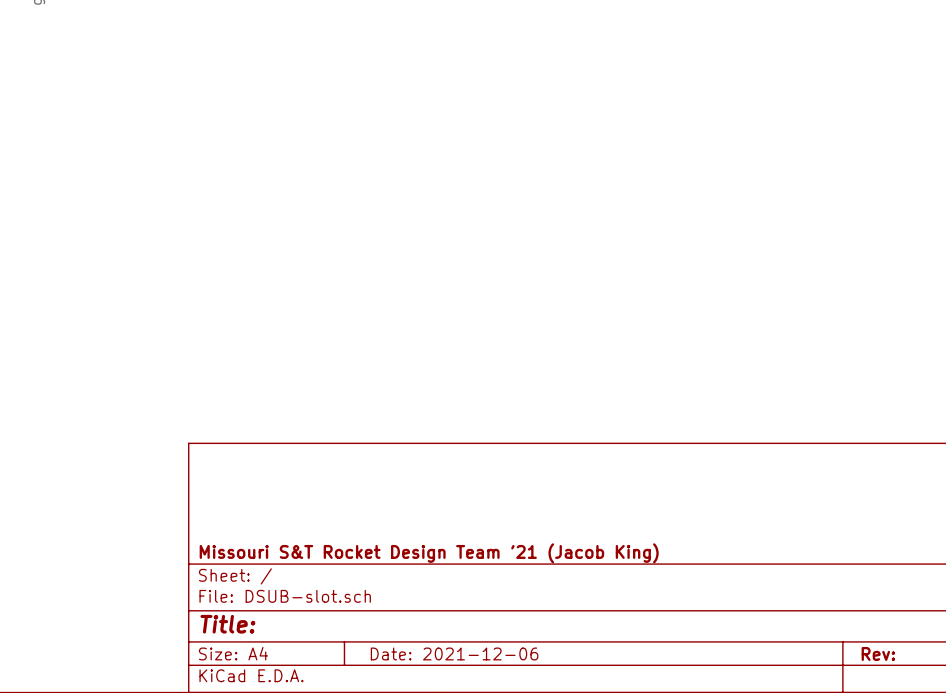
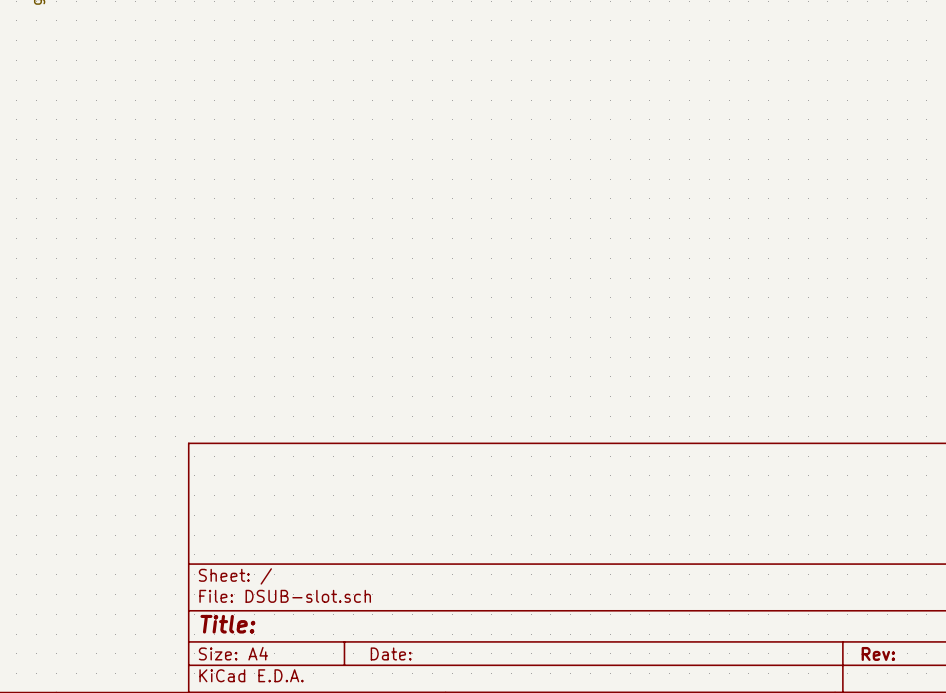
title block: Missouri S&T Rocket Design Team '21 (Jacob King) (429, 553) -> none
title block: Date: 2021-12-06 (454, 653) -> Date: (391, 653)

